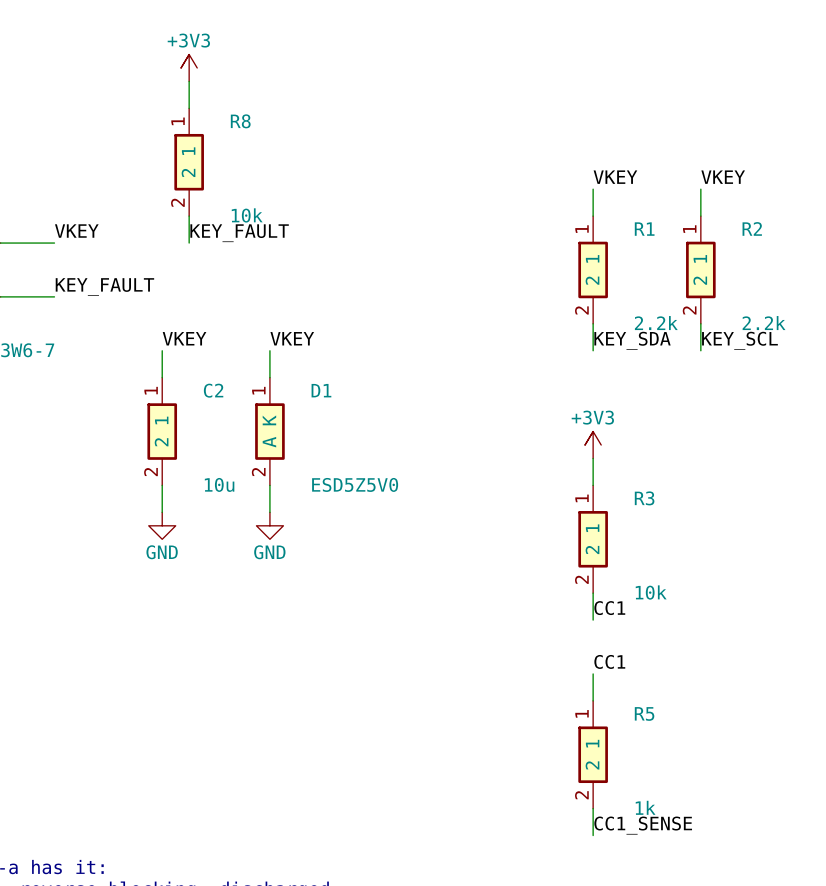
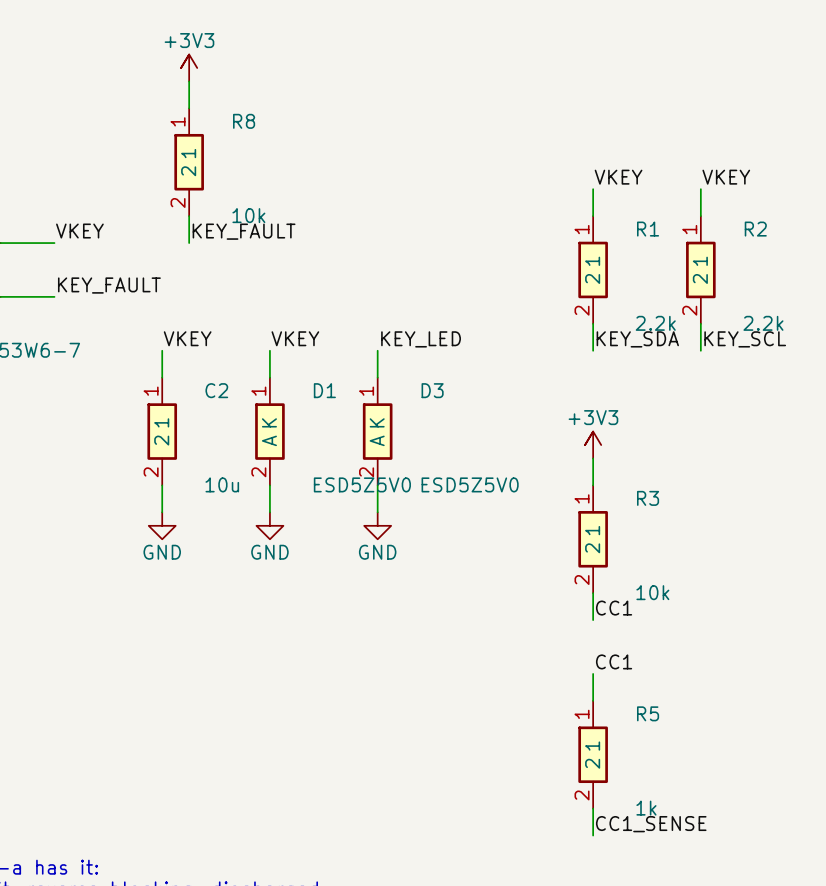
label: none -> KEY_LED (421, 339)
wire: none -> (377, 350) (377, 377)
D3: none -> ESD5Z5V0 (377, 431)
wire: none -> (377, 485) (377, 512)
power symbol: none -> GND (377, 525)

